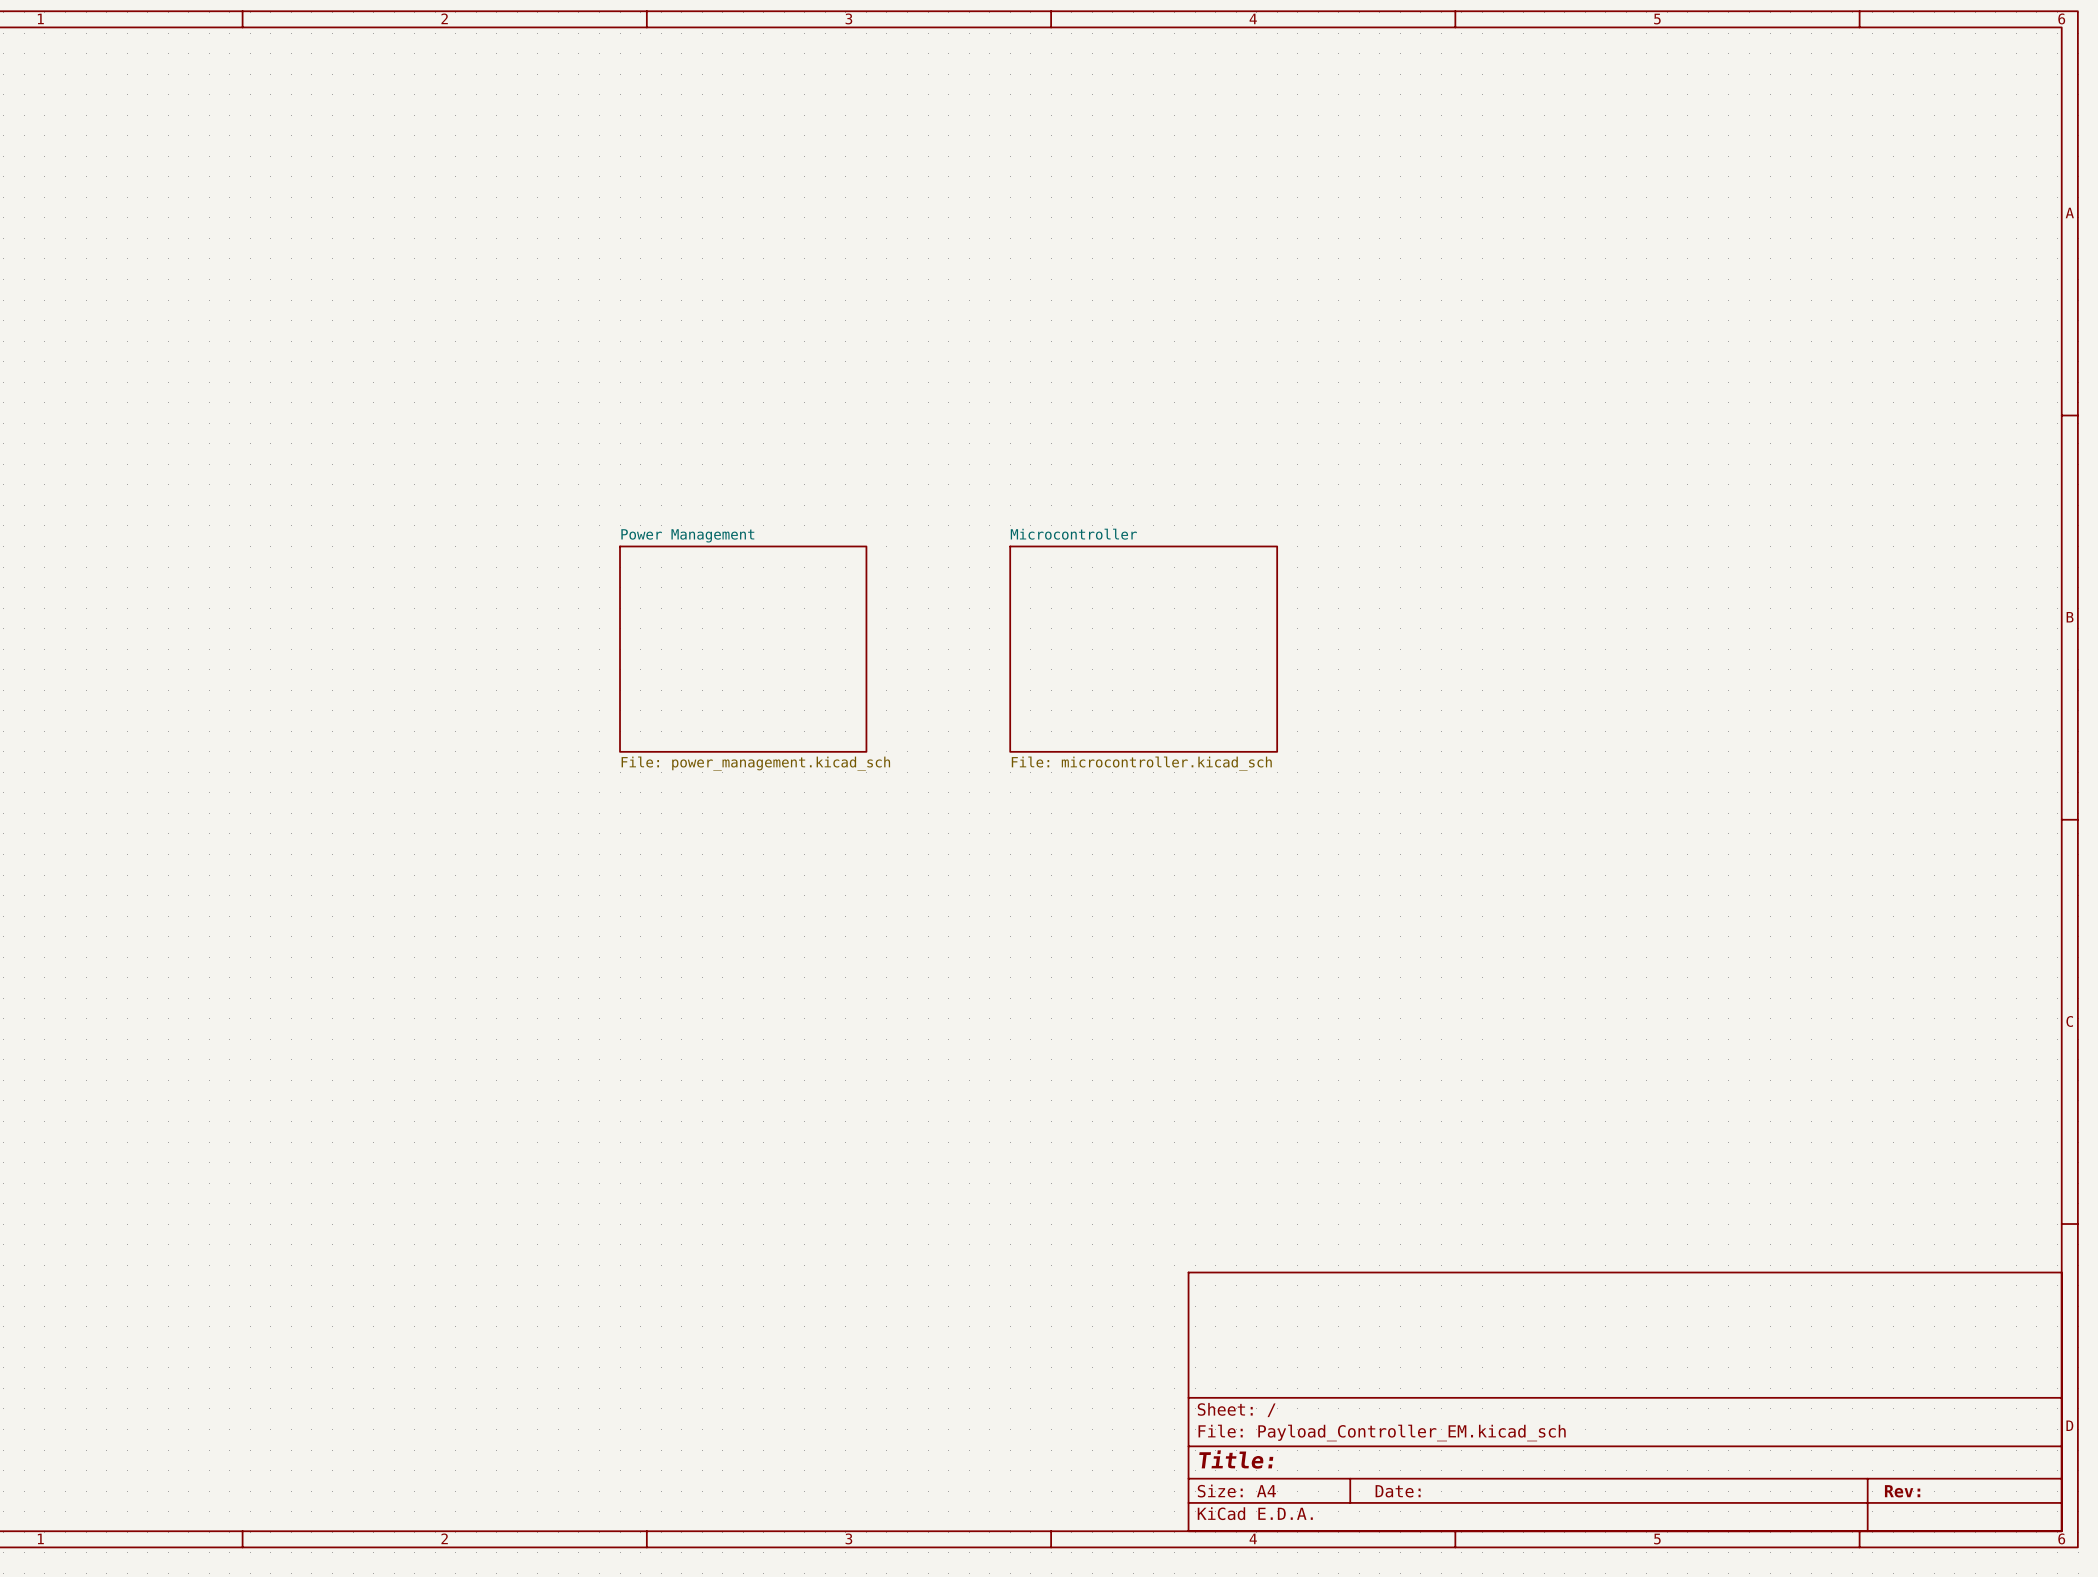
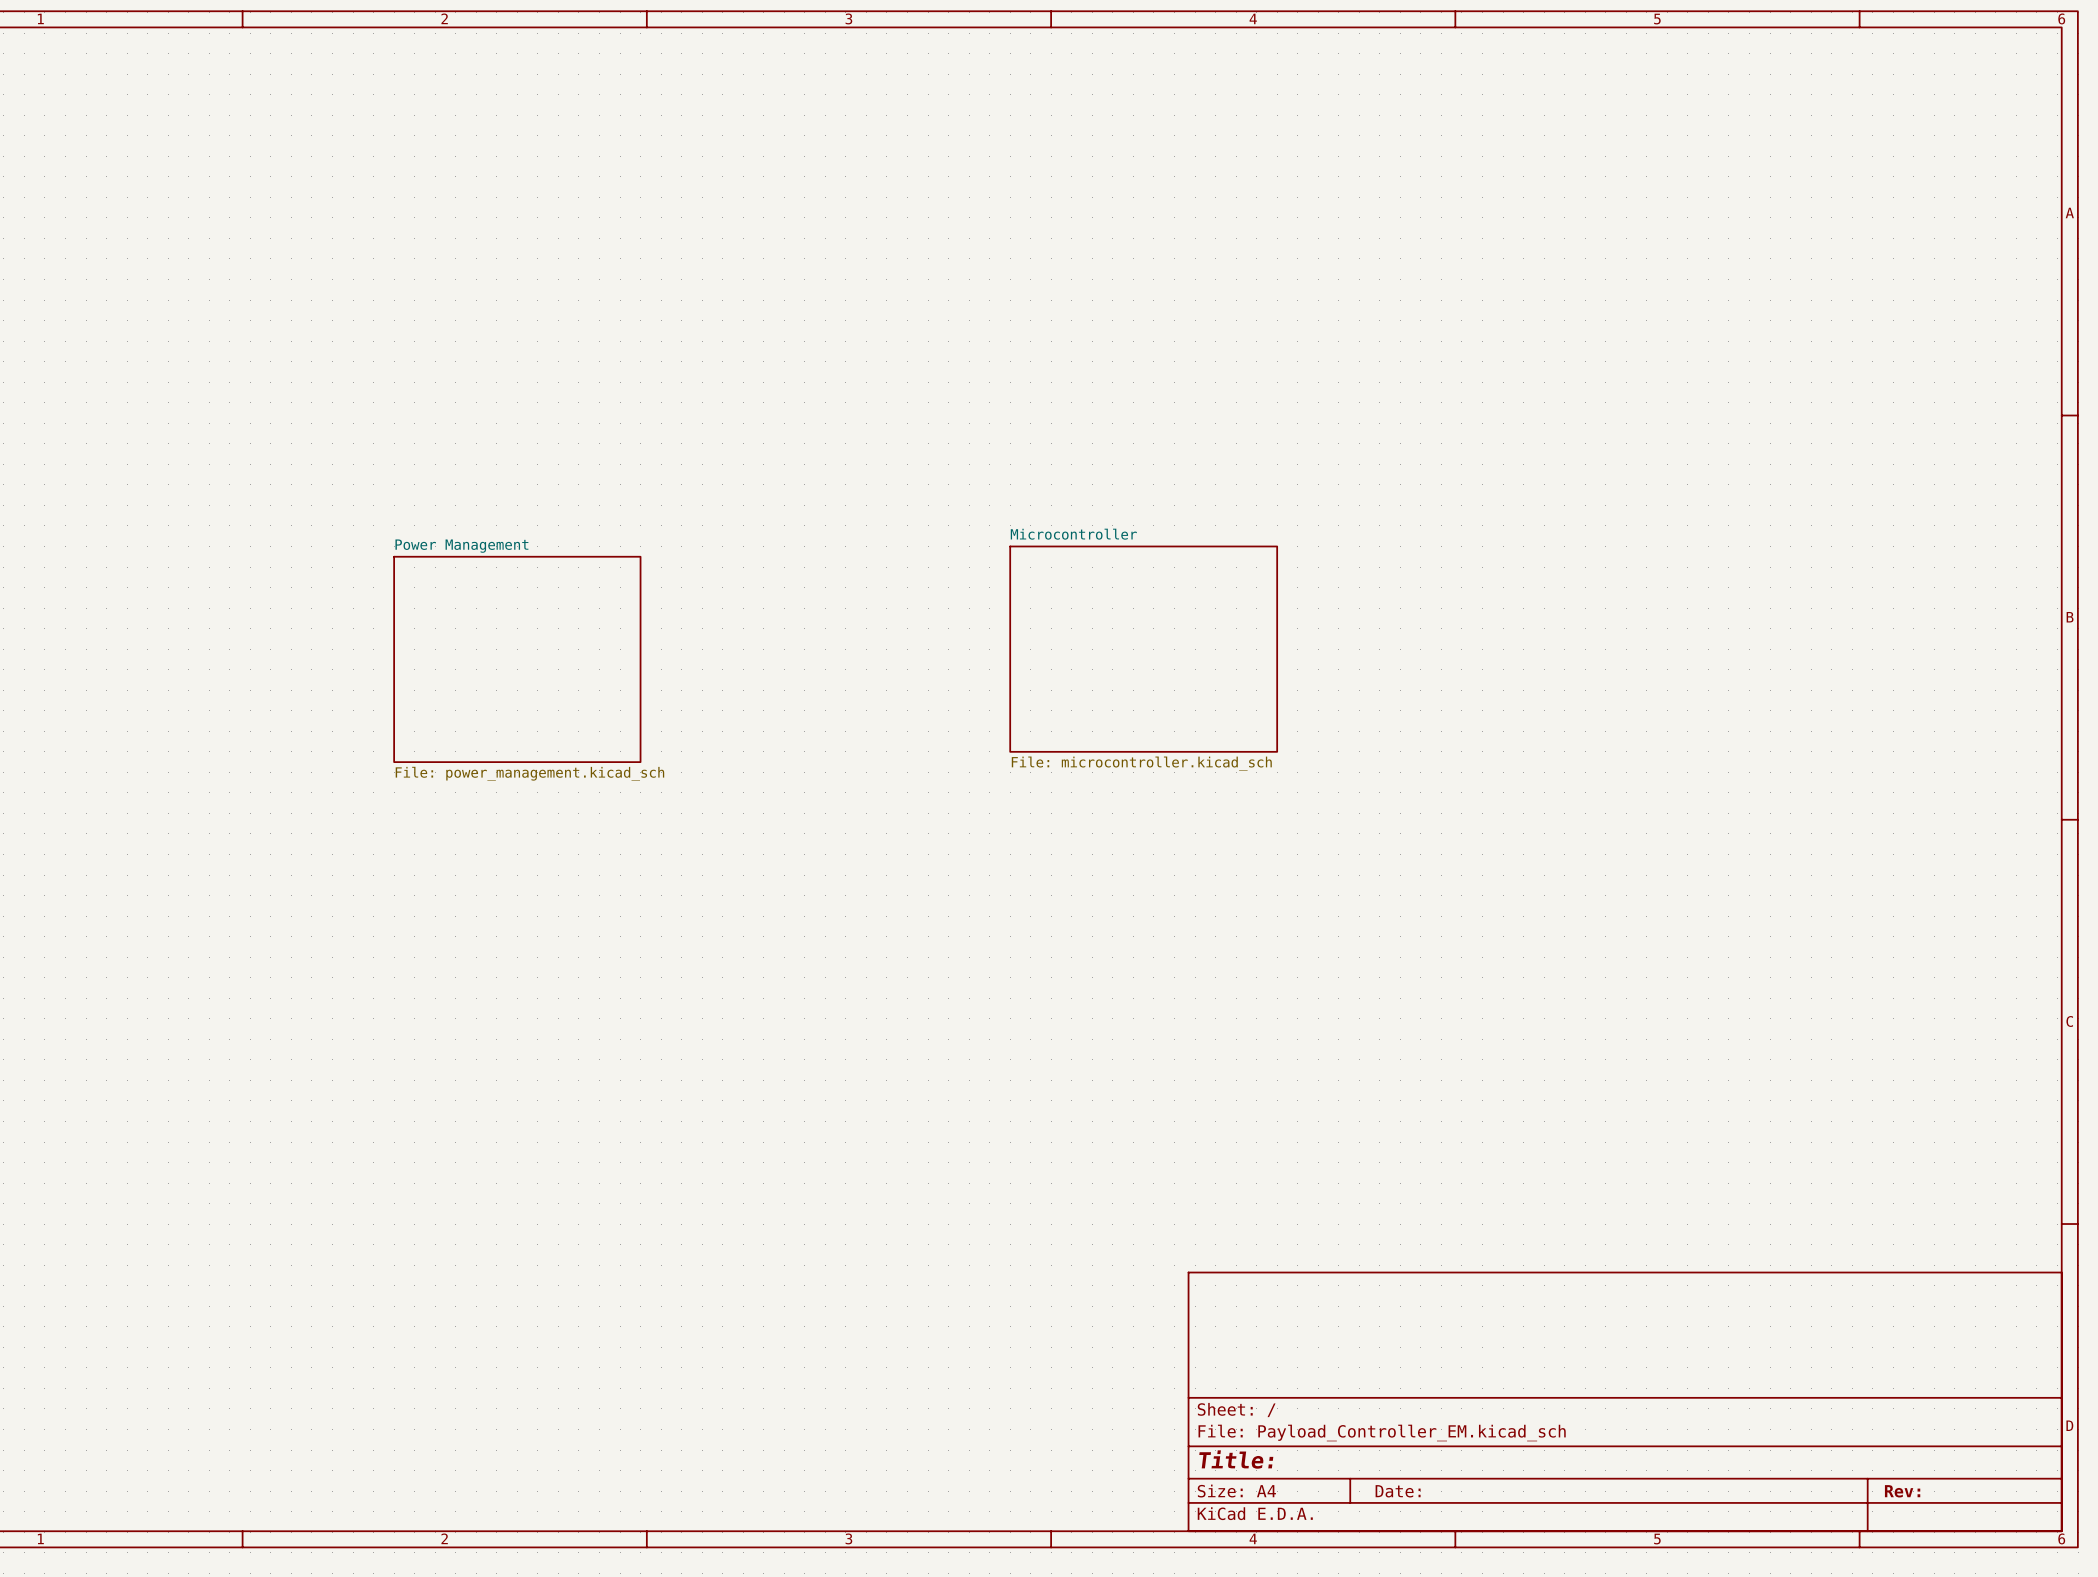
sheet Power Management: File: power_management.kicad_sch (743, 649) -> none
sheet Power Management: none -> File: power_management.kicad_sch (517, 659)

